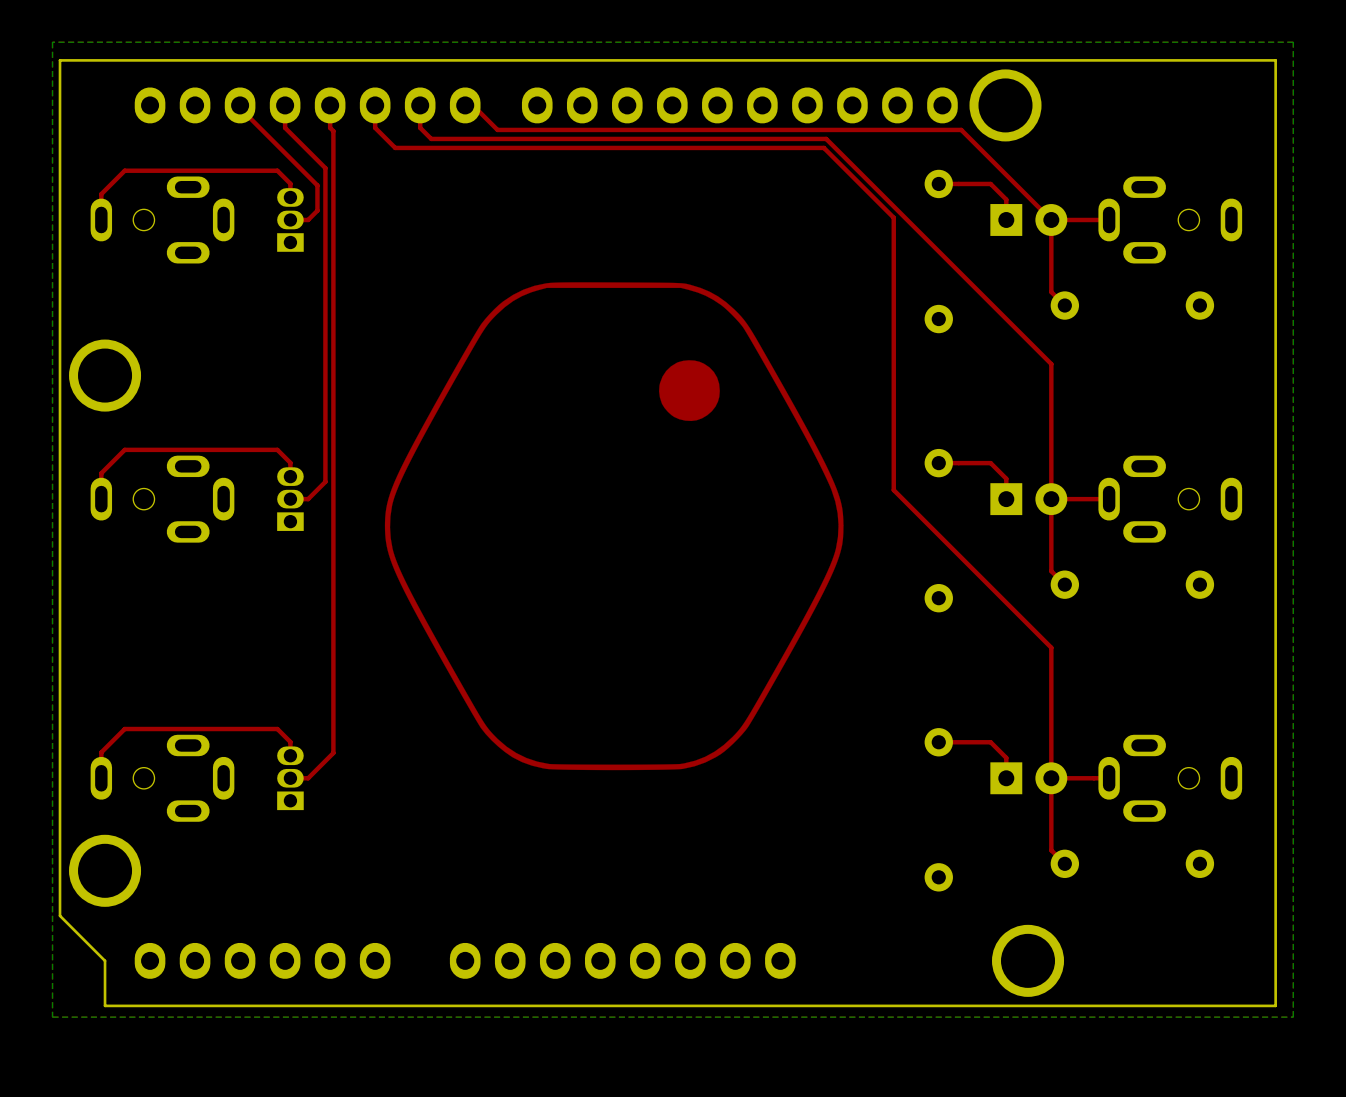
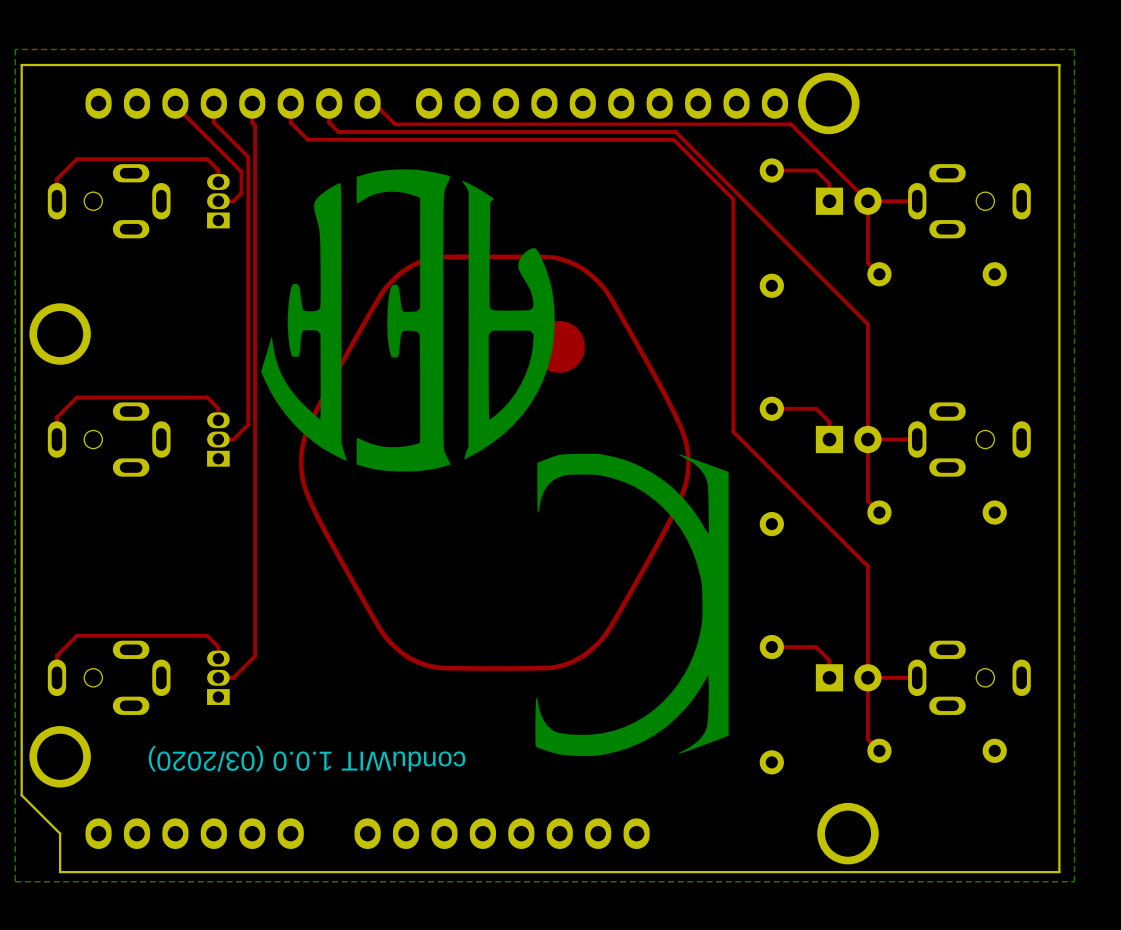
drawing: none -> [261, 169, 729, 757]
text: none -> conduWIT 1.0.0 (03/2020) (307, 758)

